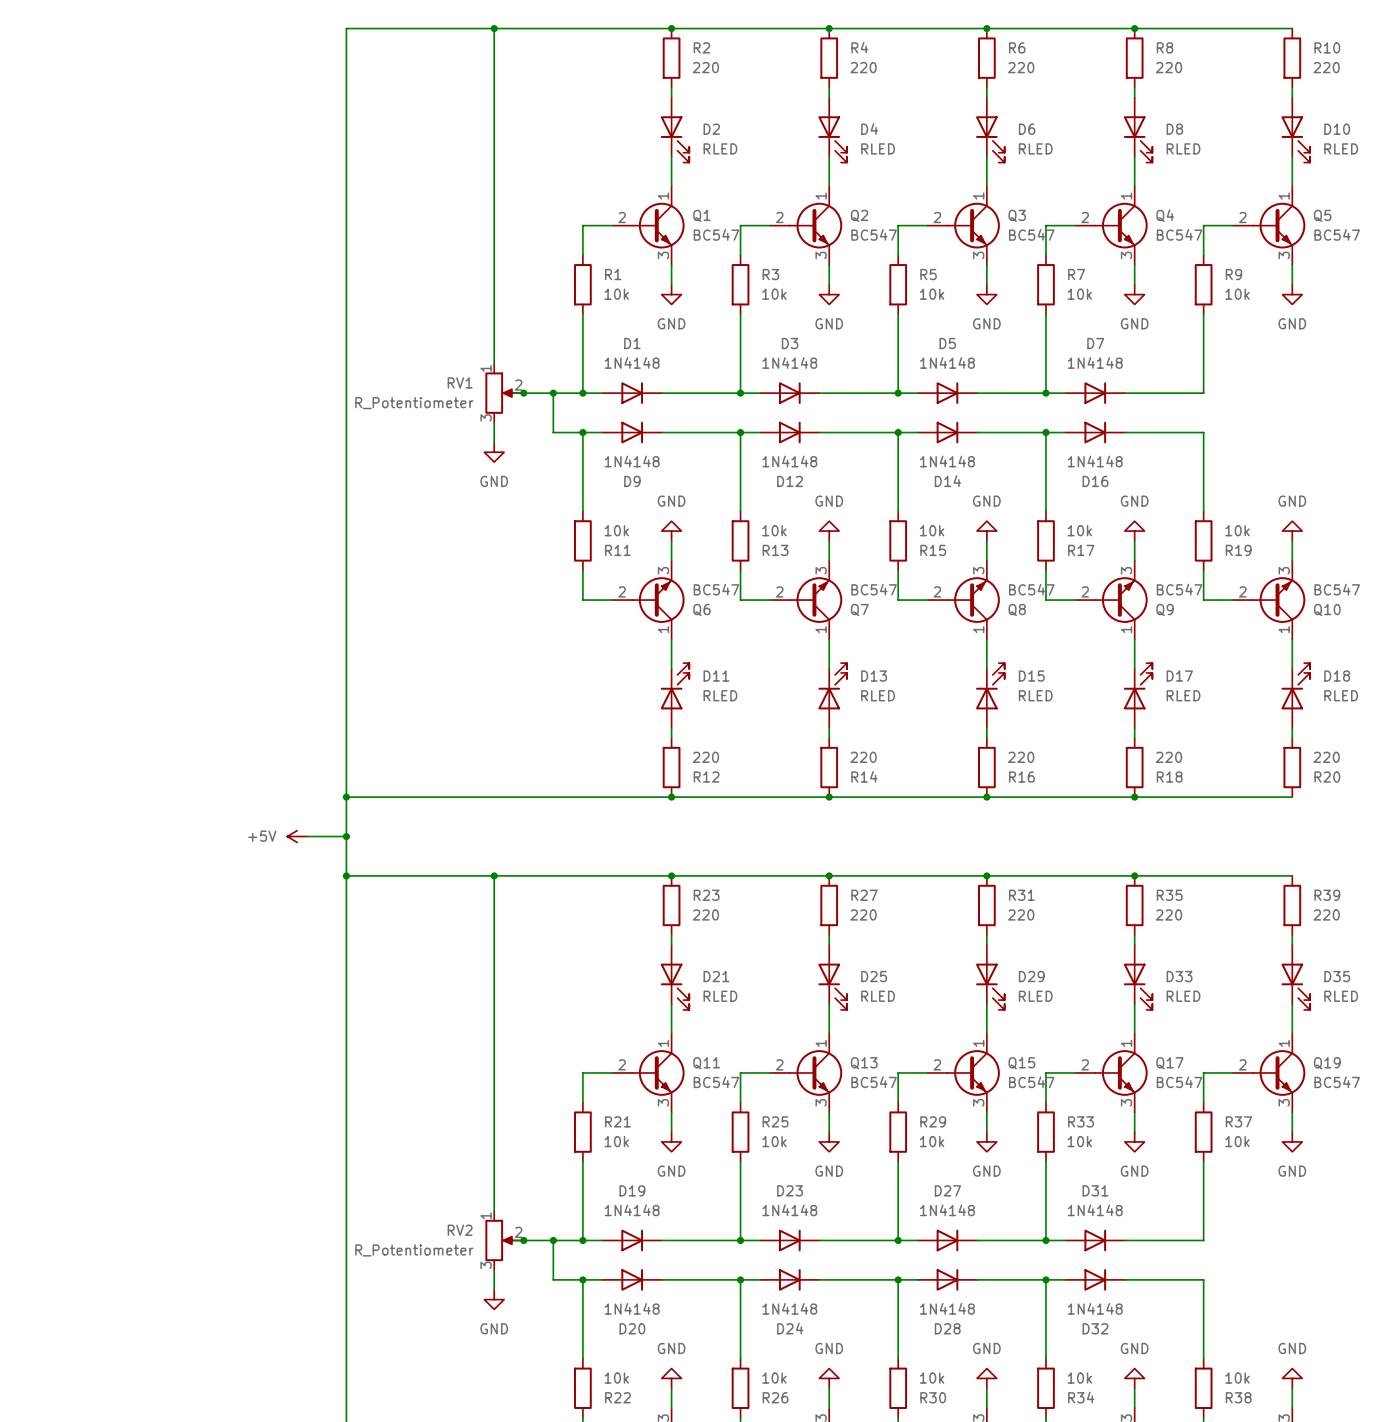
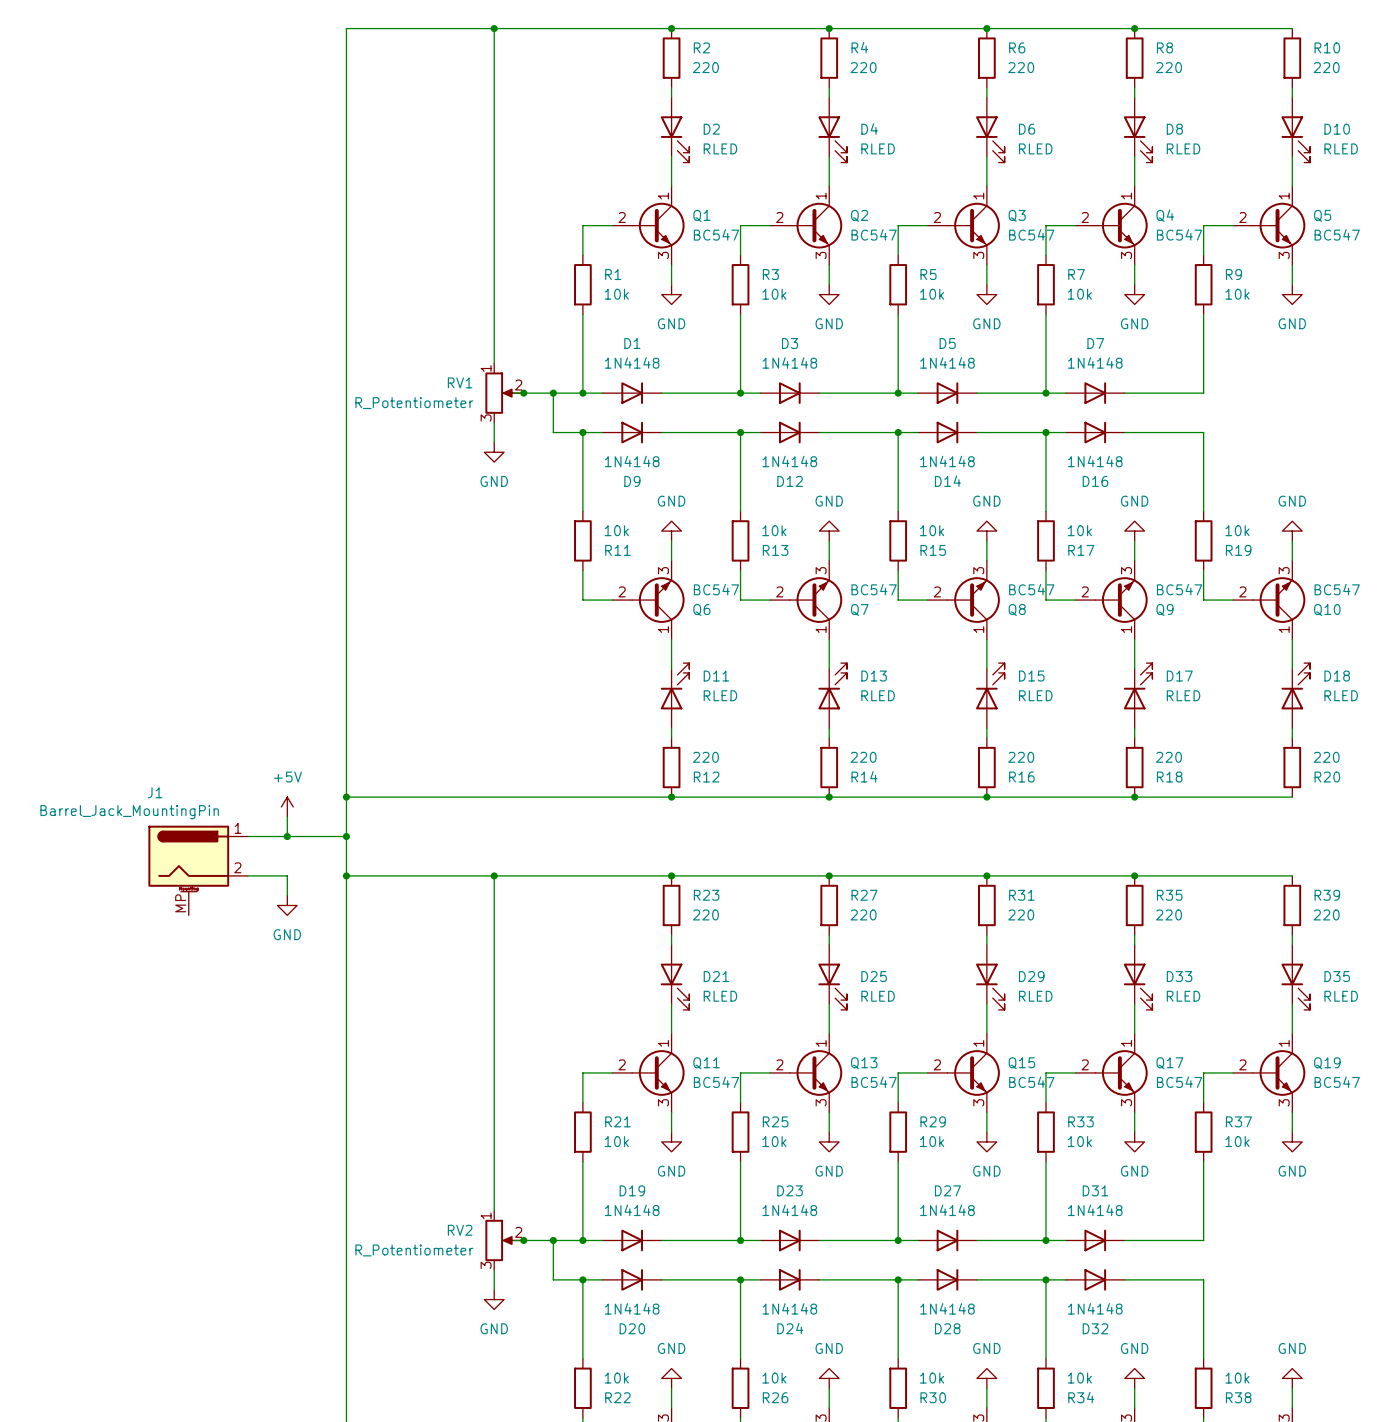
wire: none -> (287, 816) (287, 836)
wire: none -> (247, 836) (307, 836)
junction: none -> (287, 836)
power symbol rotation: 0° (297, 836) -> 90° clockwise (287, 806)
power symbol position: +5V (297, 836) -> +5V (287, 806)
J1: none -> Barrel_Jack_MountingPin (198, 870)
wire: none -> (247, 875) (287, 875) (287, 895)
power symbol: none -> GND (287, 905)

